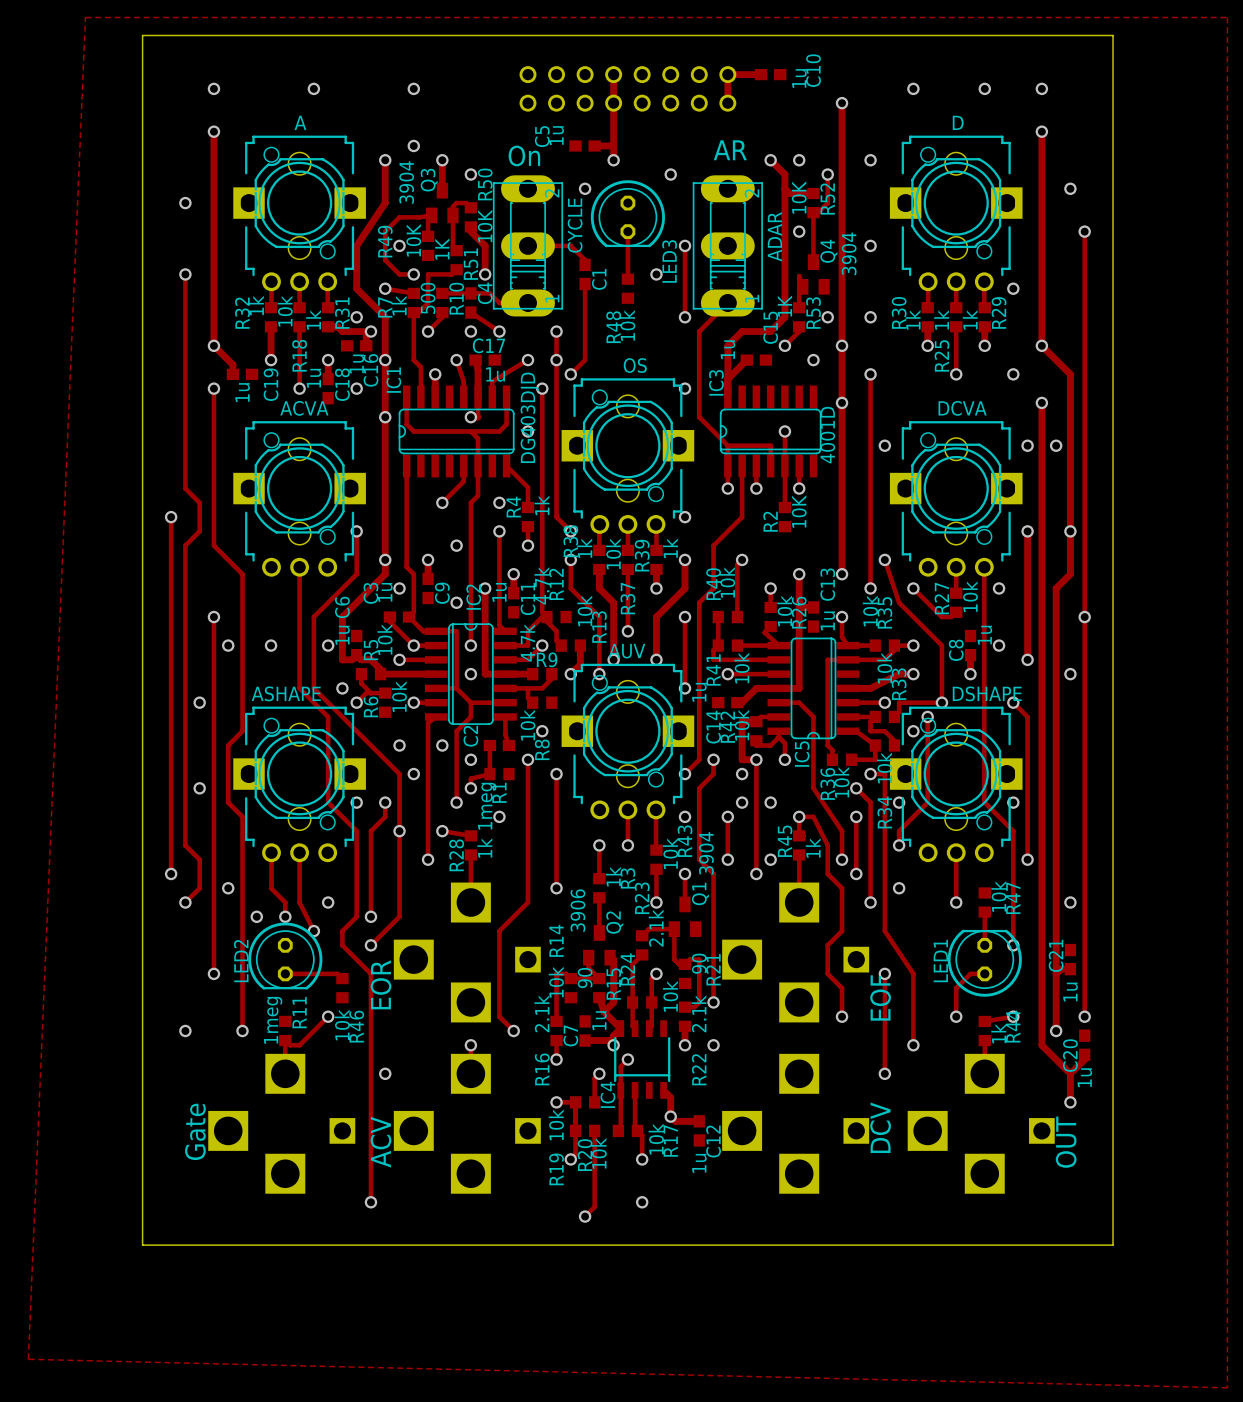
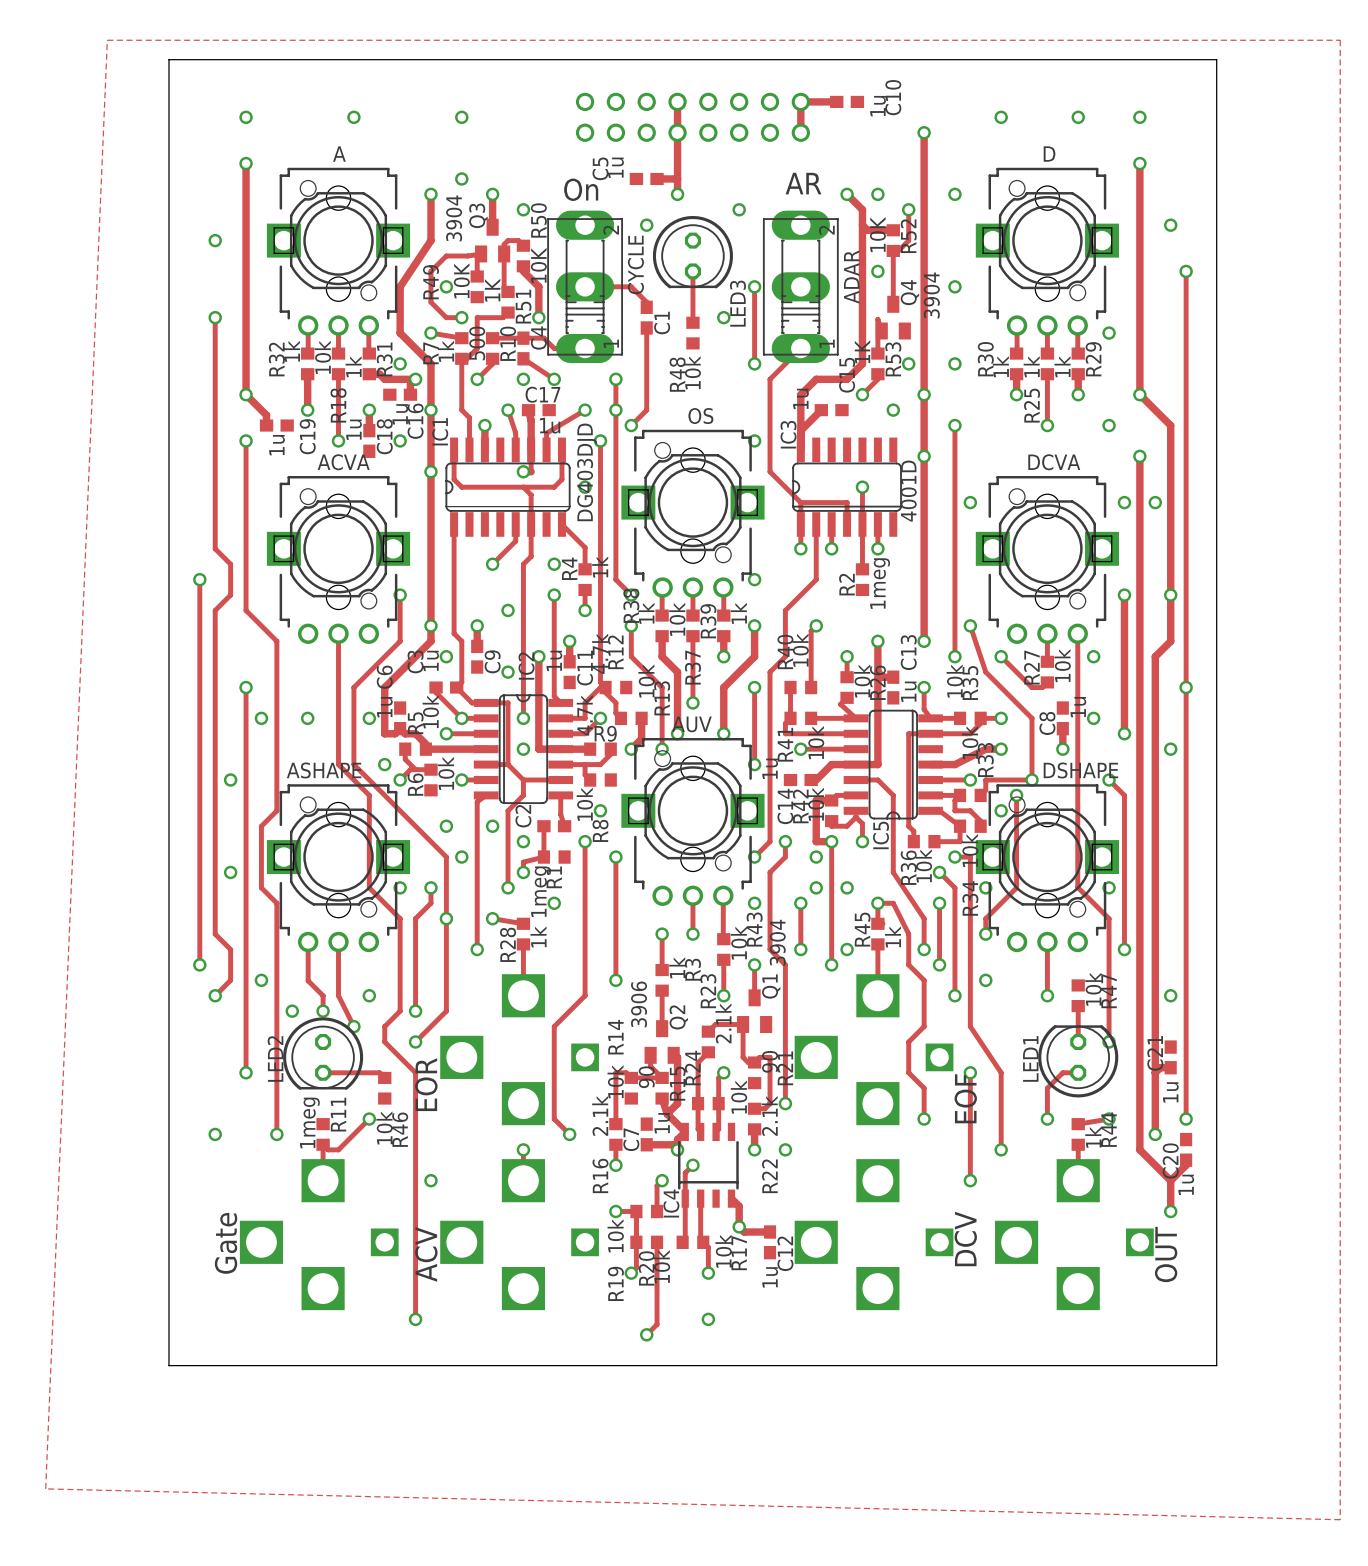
R2 value: 10K (799, 511) -> 1meg (880, 583)

